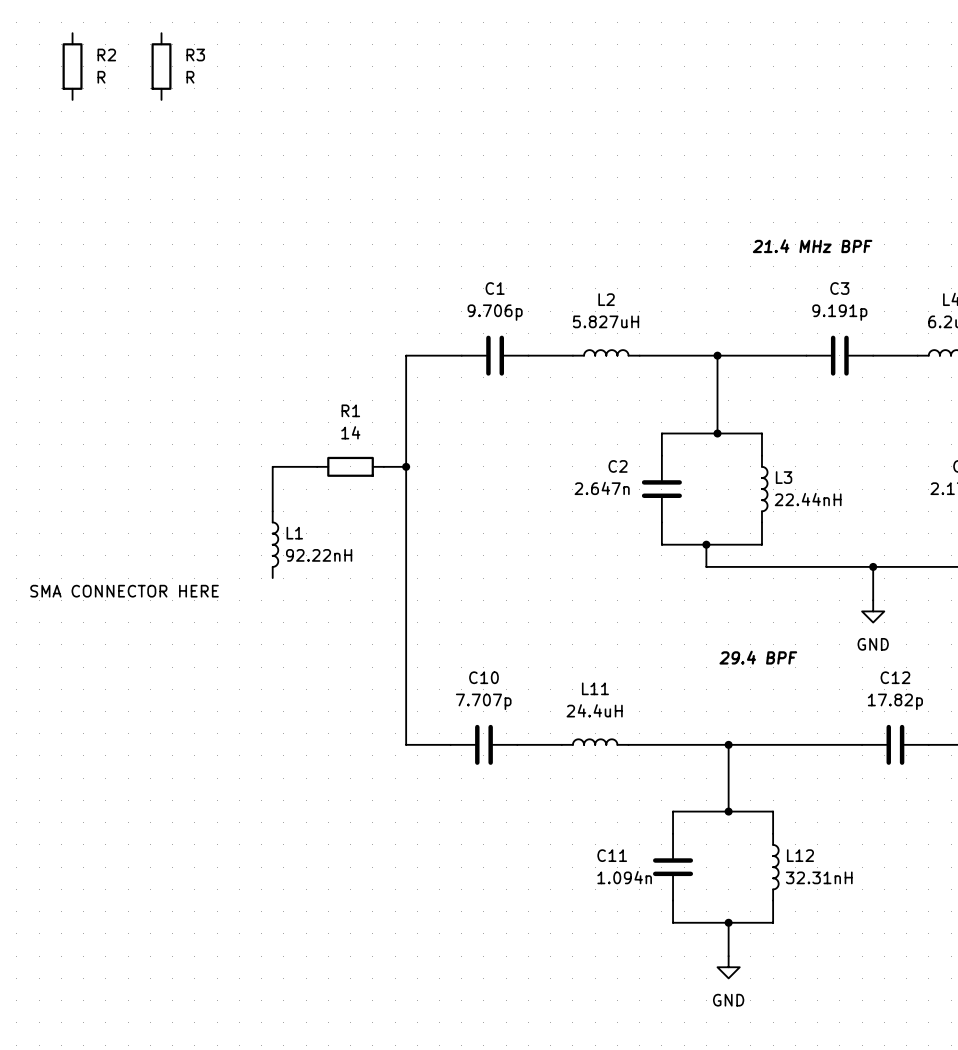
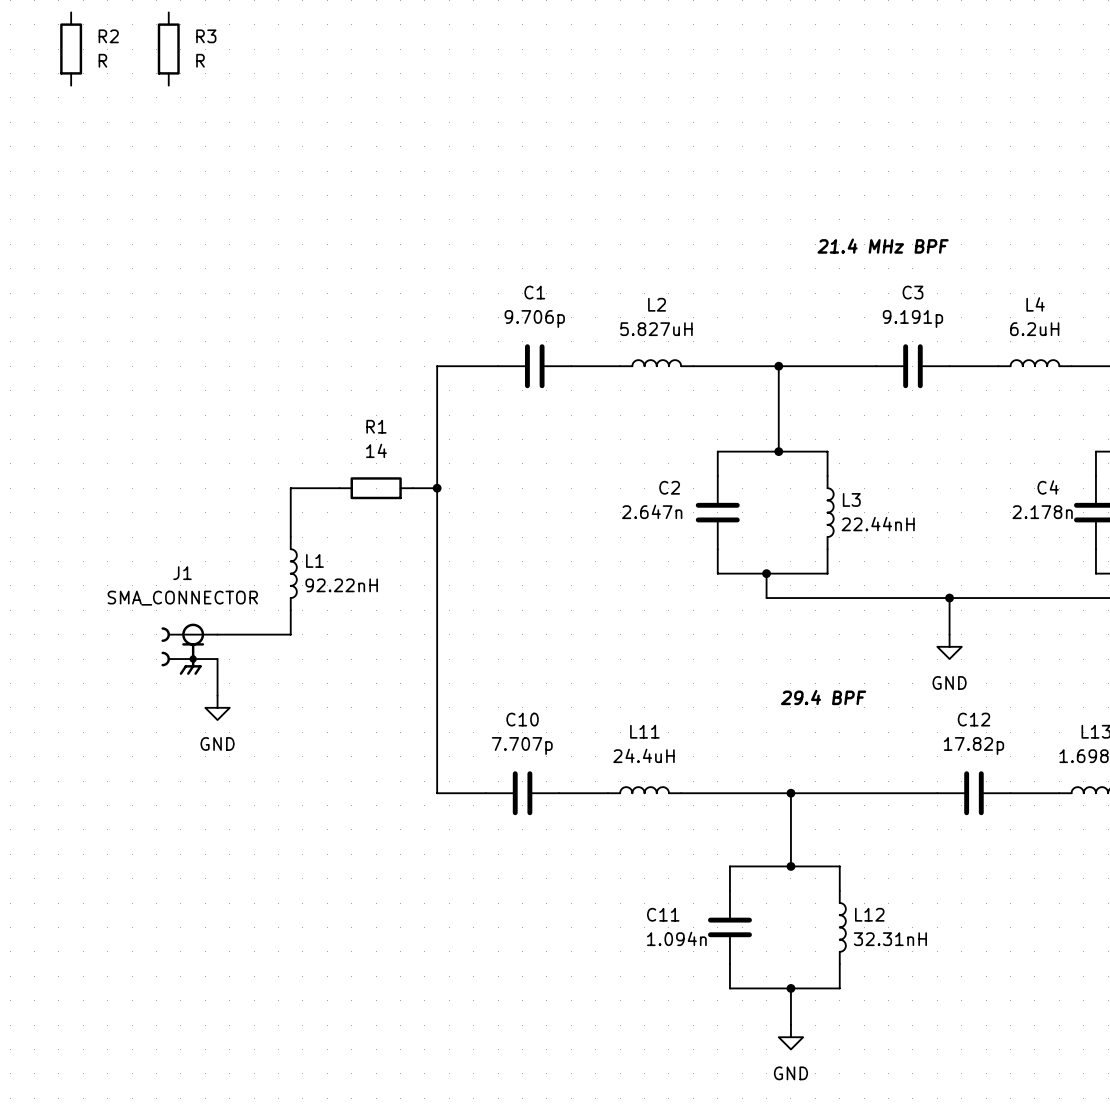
wire: none -> (290, 610) (290, 634) (217, 634)
text: SMA CONNECTOR HERE (124, 591) -> none
J1: none -> SMA_CONNECTOR (189, 649)
wire: none -> (217, 659) (217, 695)
power symbol: none -> GND (217, 707)

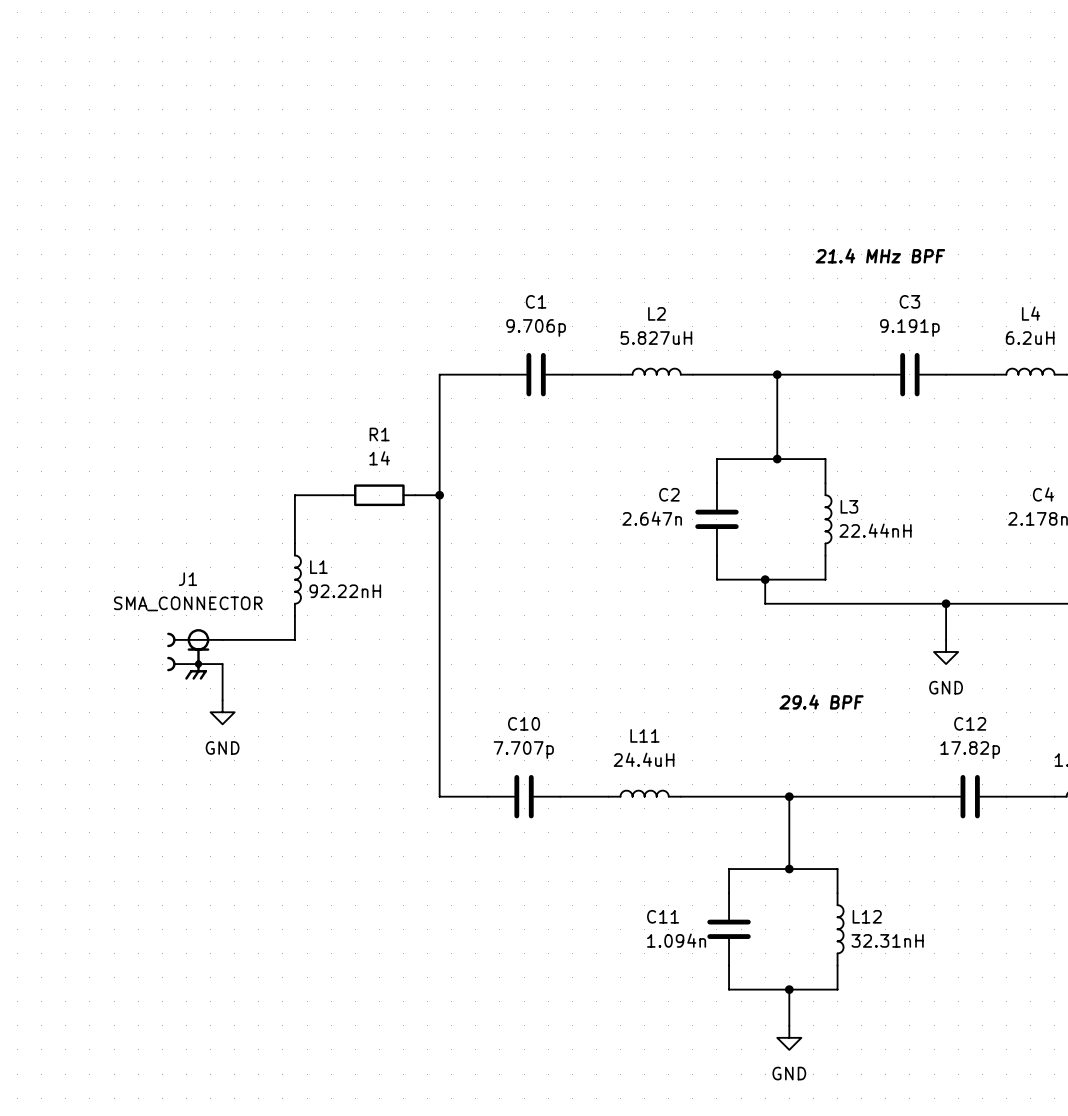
R2: R (71, 49) -> none
R3: R (168, 49) -> none

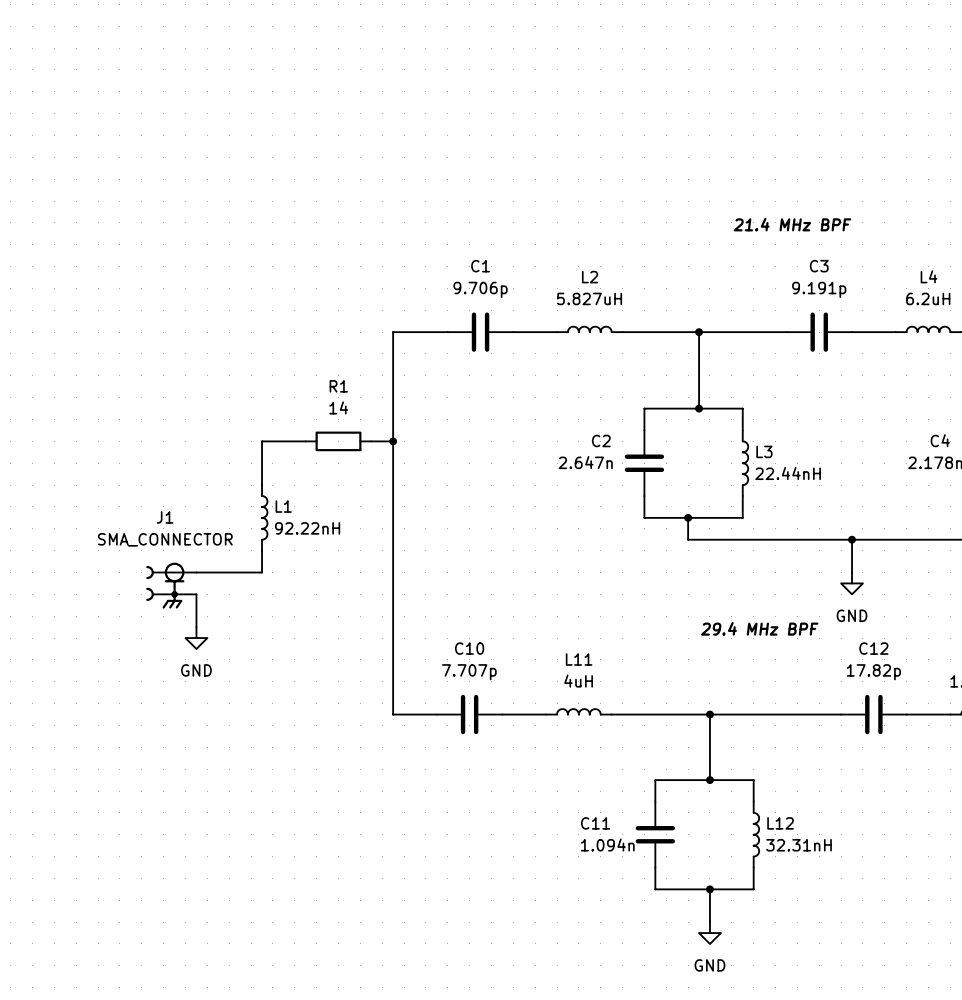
text: 29.4 BPF (821, 702) -> 29.4 MHz BPF (759, 628)
L11 value: 24.4uH (644, 759) -> 4uH (578, 681)

